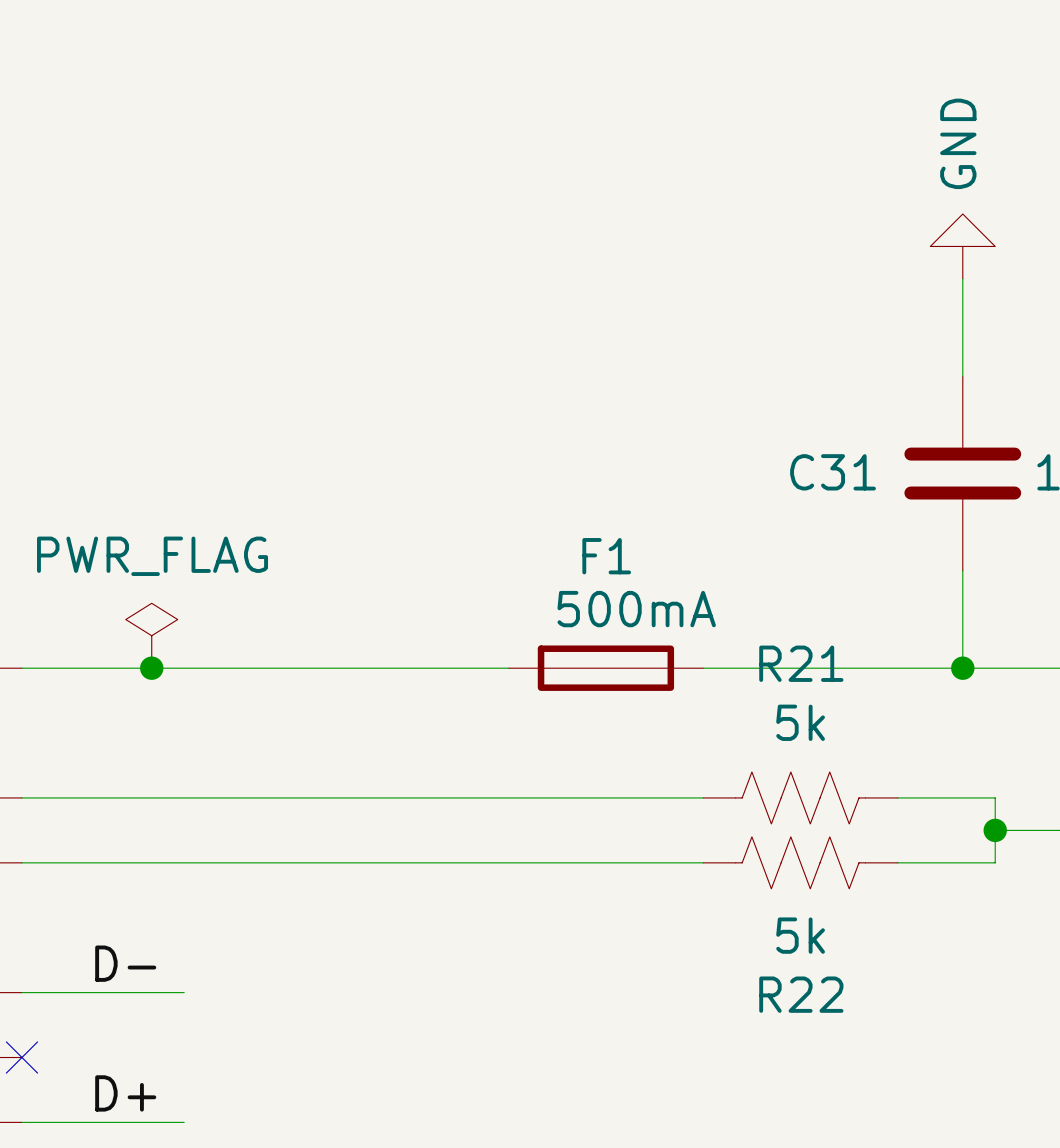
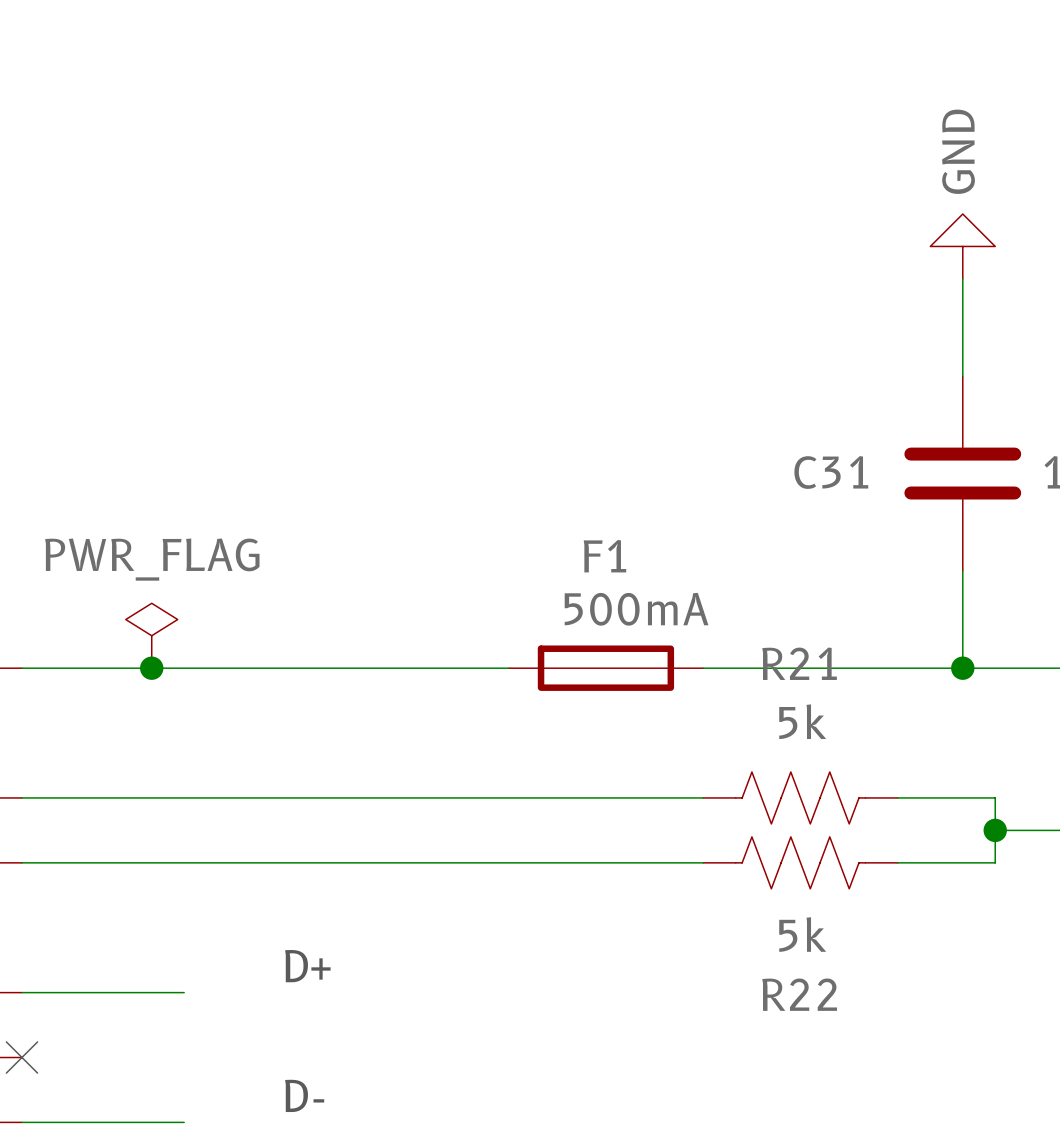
label: D- (125, 963) -> none
text: none -> D+ (307, 966)
label: D+ (125, 1093) -> none
text: none -> D- (304, 1095)

